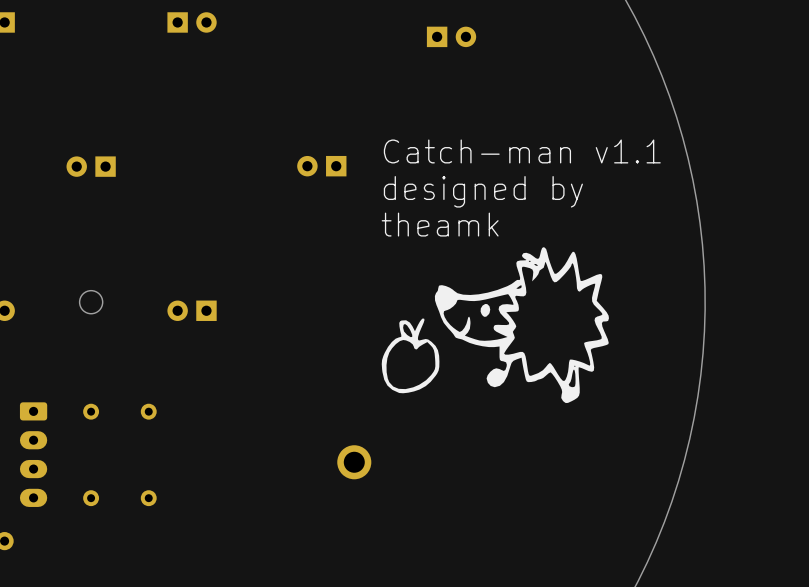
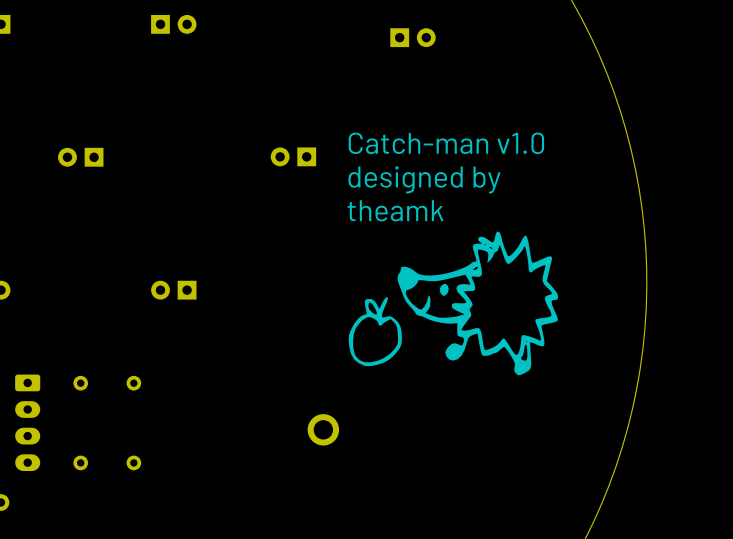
text: Catch-man v1.1 (522, 151) -> Catch-man v1.0 (446, 143)
round board edge: [79, 290, 103, 315] -> none

